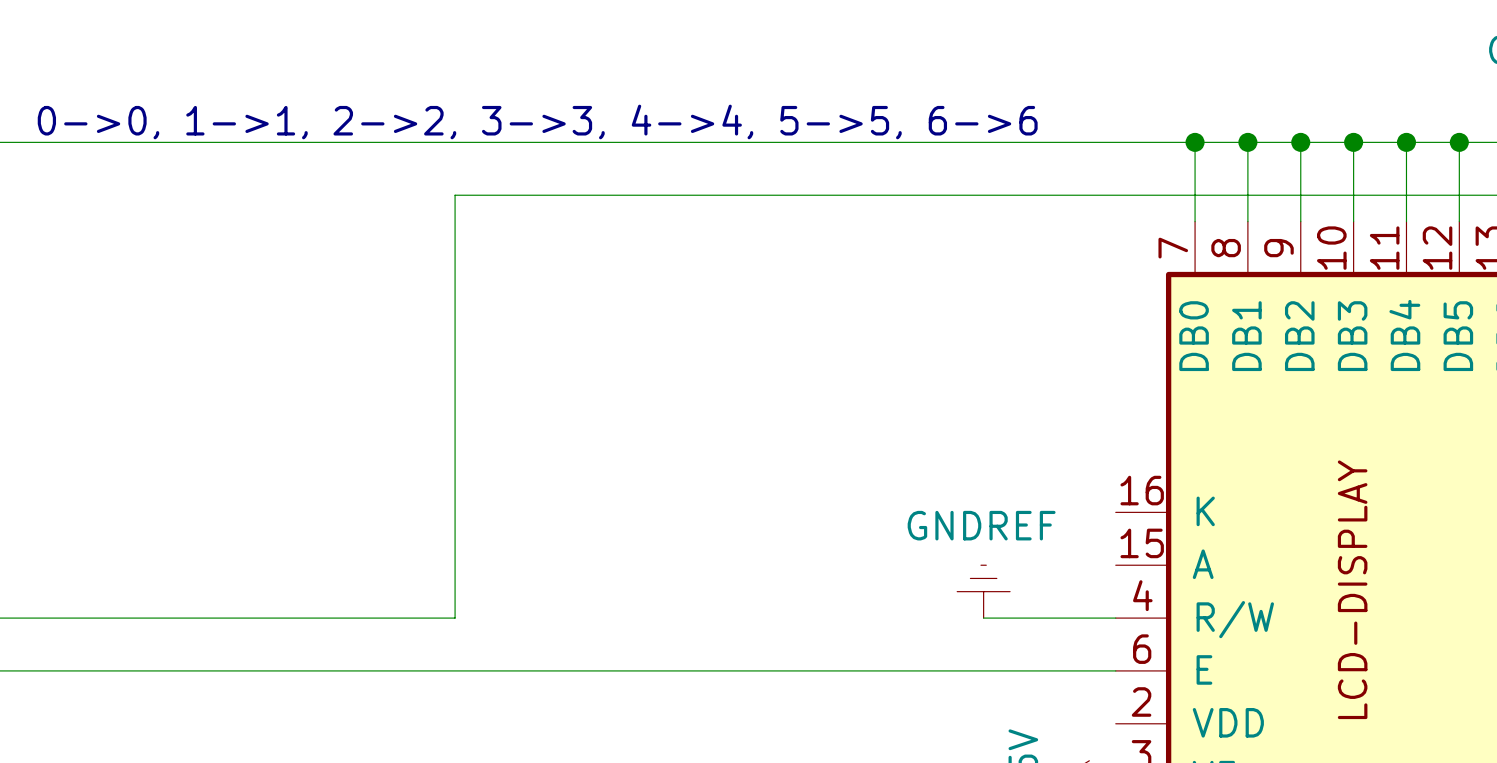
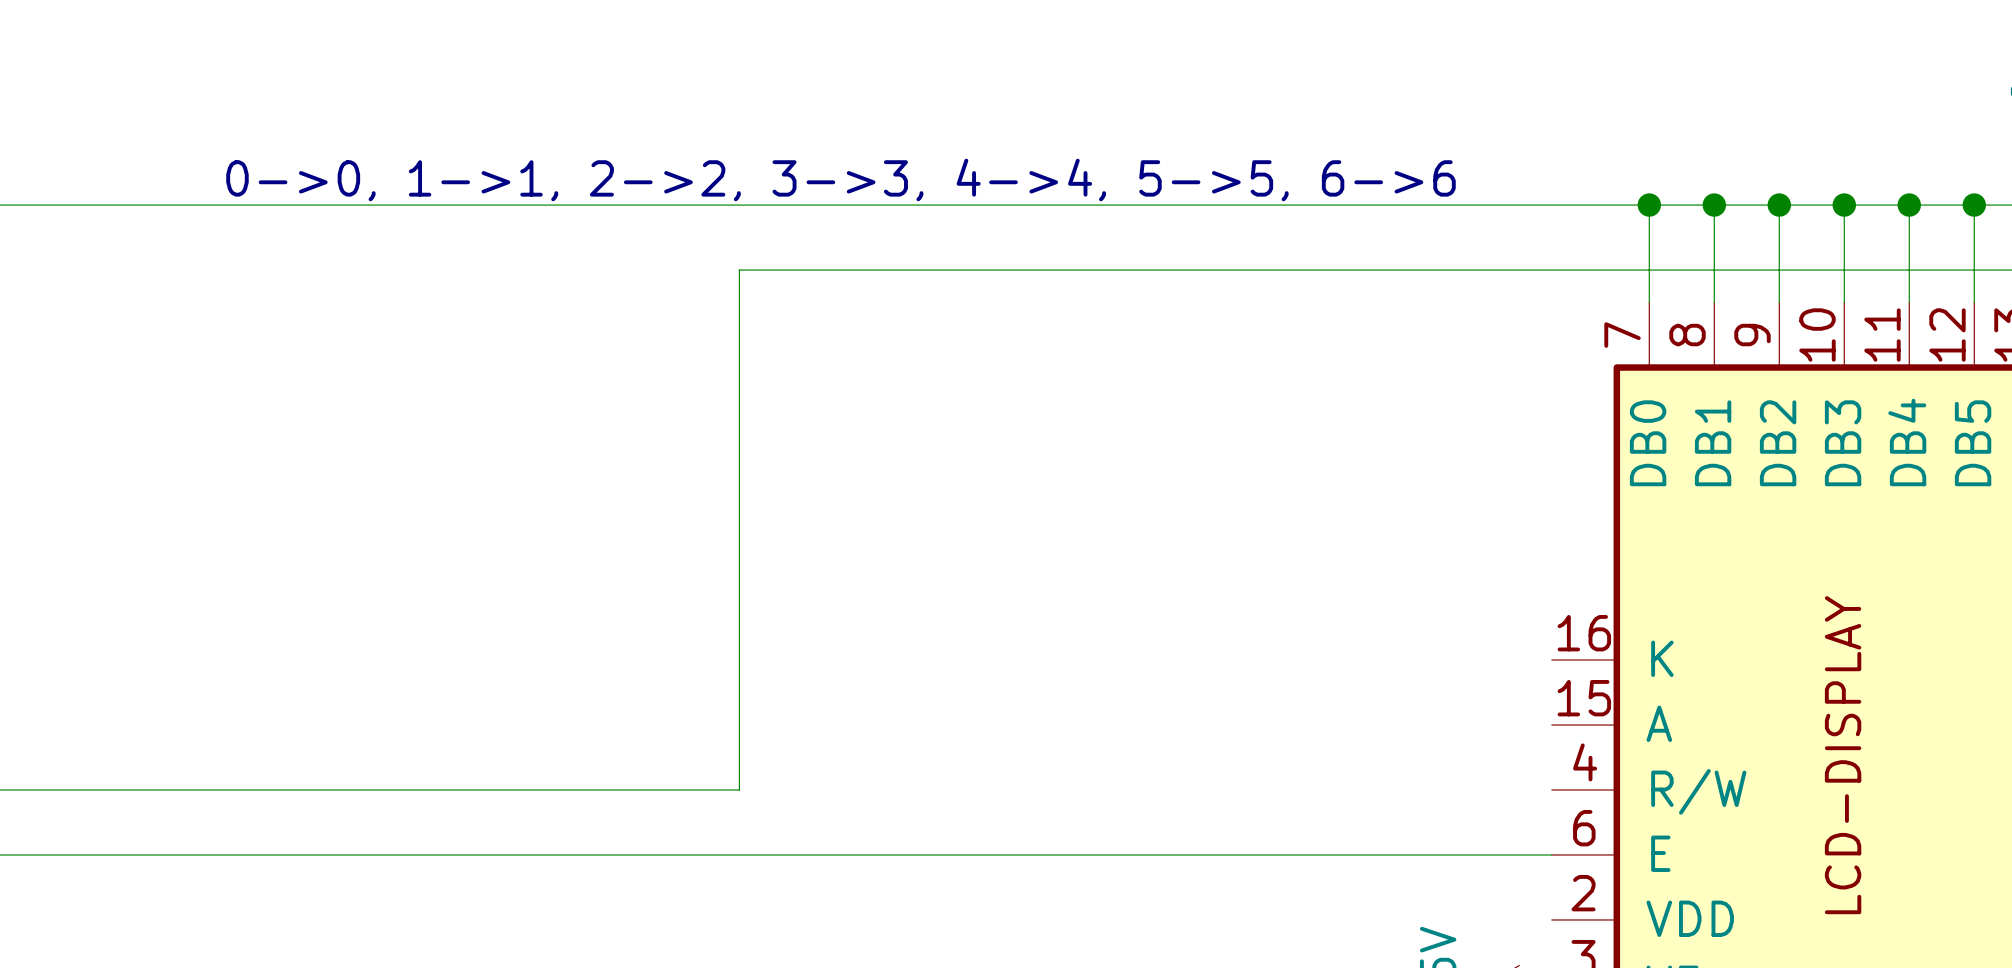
power symbol: GNDREF (983, 591) -> none
wire: (983, 618) (1115, 618) -> none

